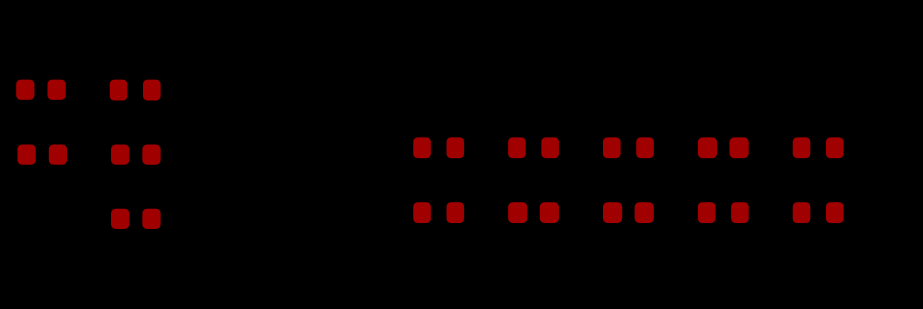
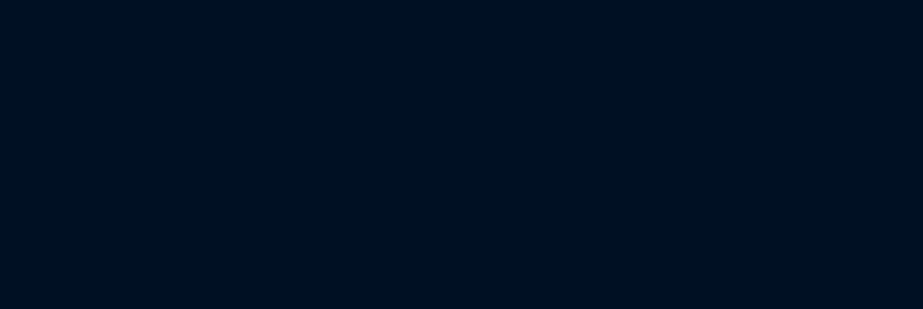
part: (40, 89) -> none
part: (135, 90) -> none
part: (438, 147) -> none
part: (533, 147) -> none
part: (628, 147) -> none
part: (723, 147) -> none
part: (818, 147) -> none
part: (42, 154) -> none
part: (135, 154) -> none
part: (438, 212) -> none
part: (533, 212) -> none
part: (628, 212) -> none
part: (723, 212) -> none
part: (818, 212) -> none
part: (135, 218) -> none

